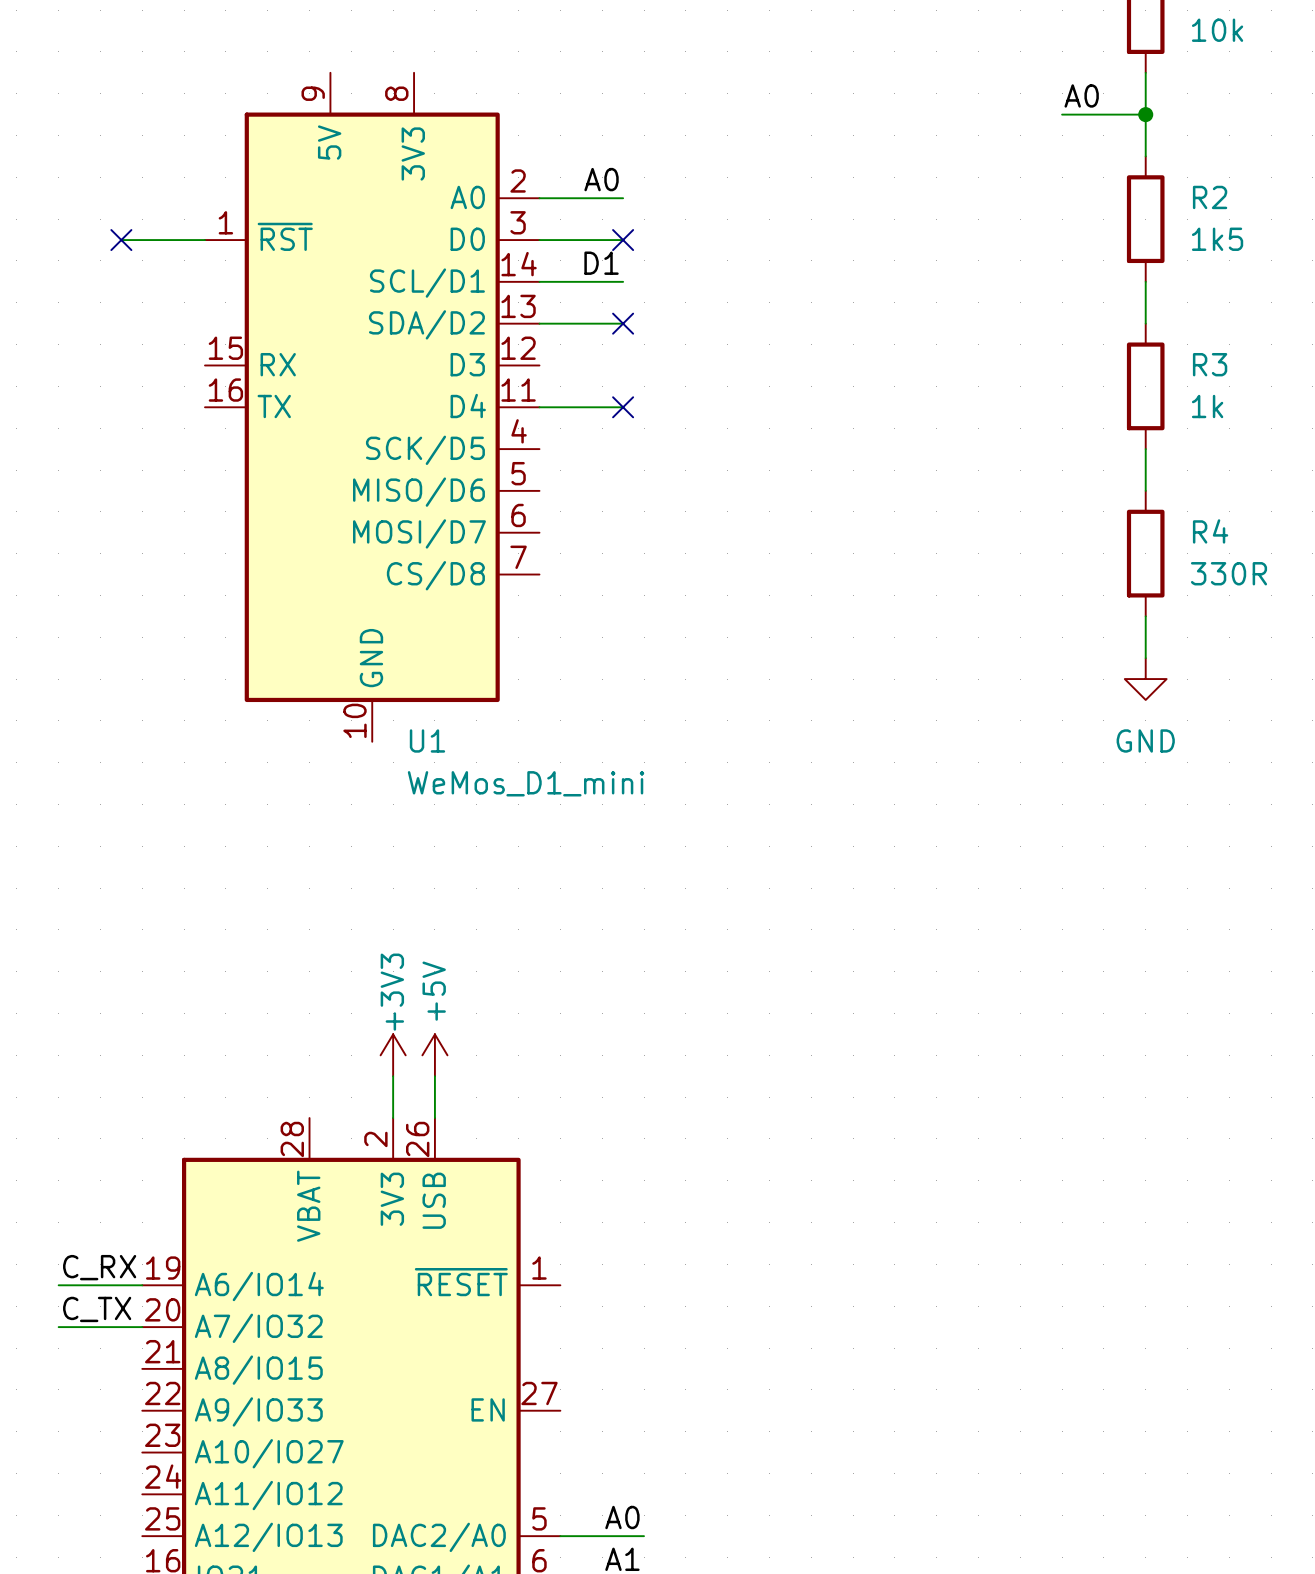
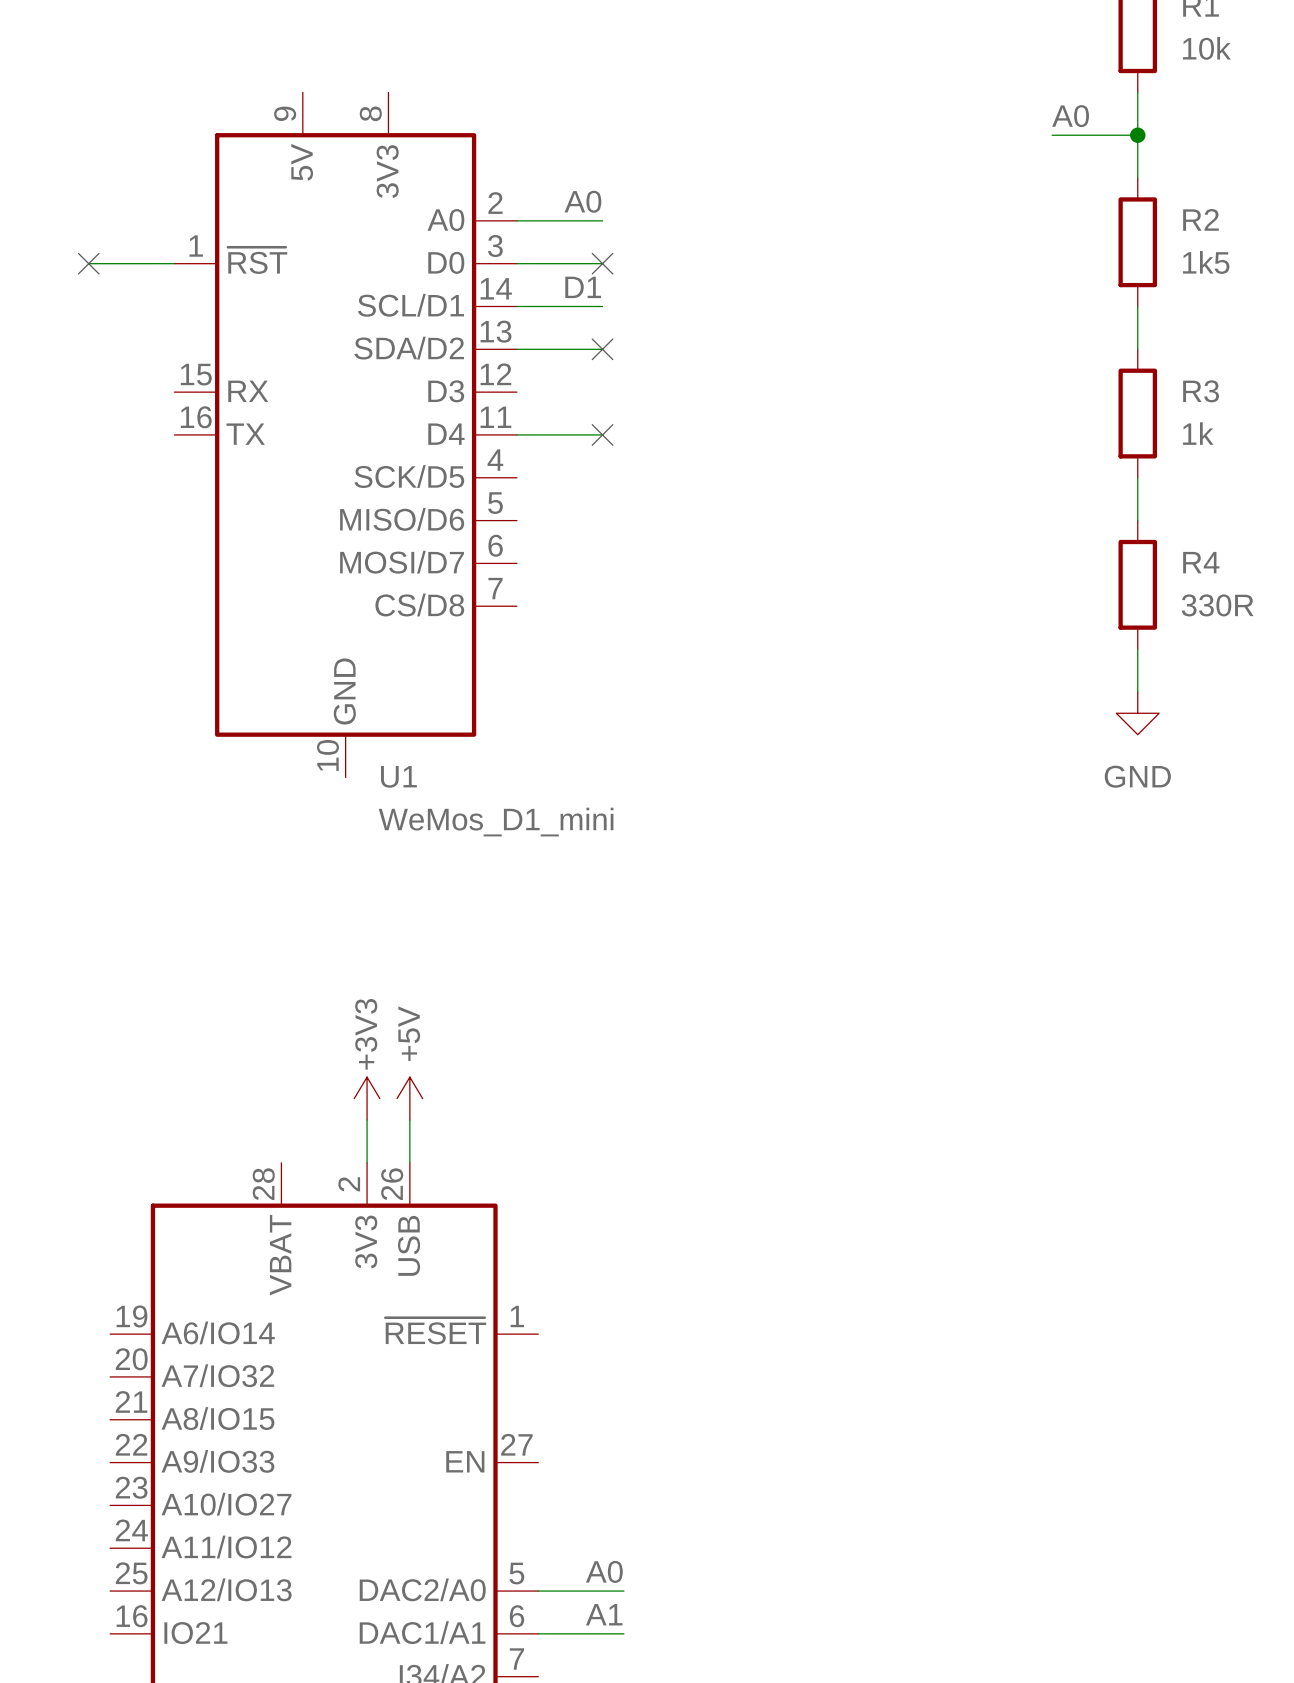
label: C_RX (99, 1267) -> none
wire: (58, 1285) (142, 1285) -> none
label: C_TX (97, 1309) -> none
wire: (58, 1327) (142, 1327) -> none

